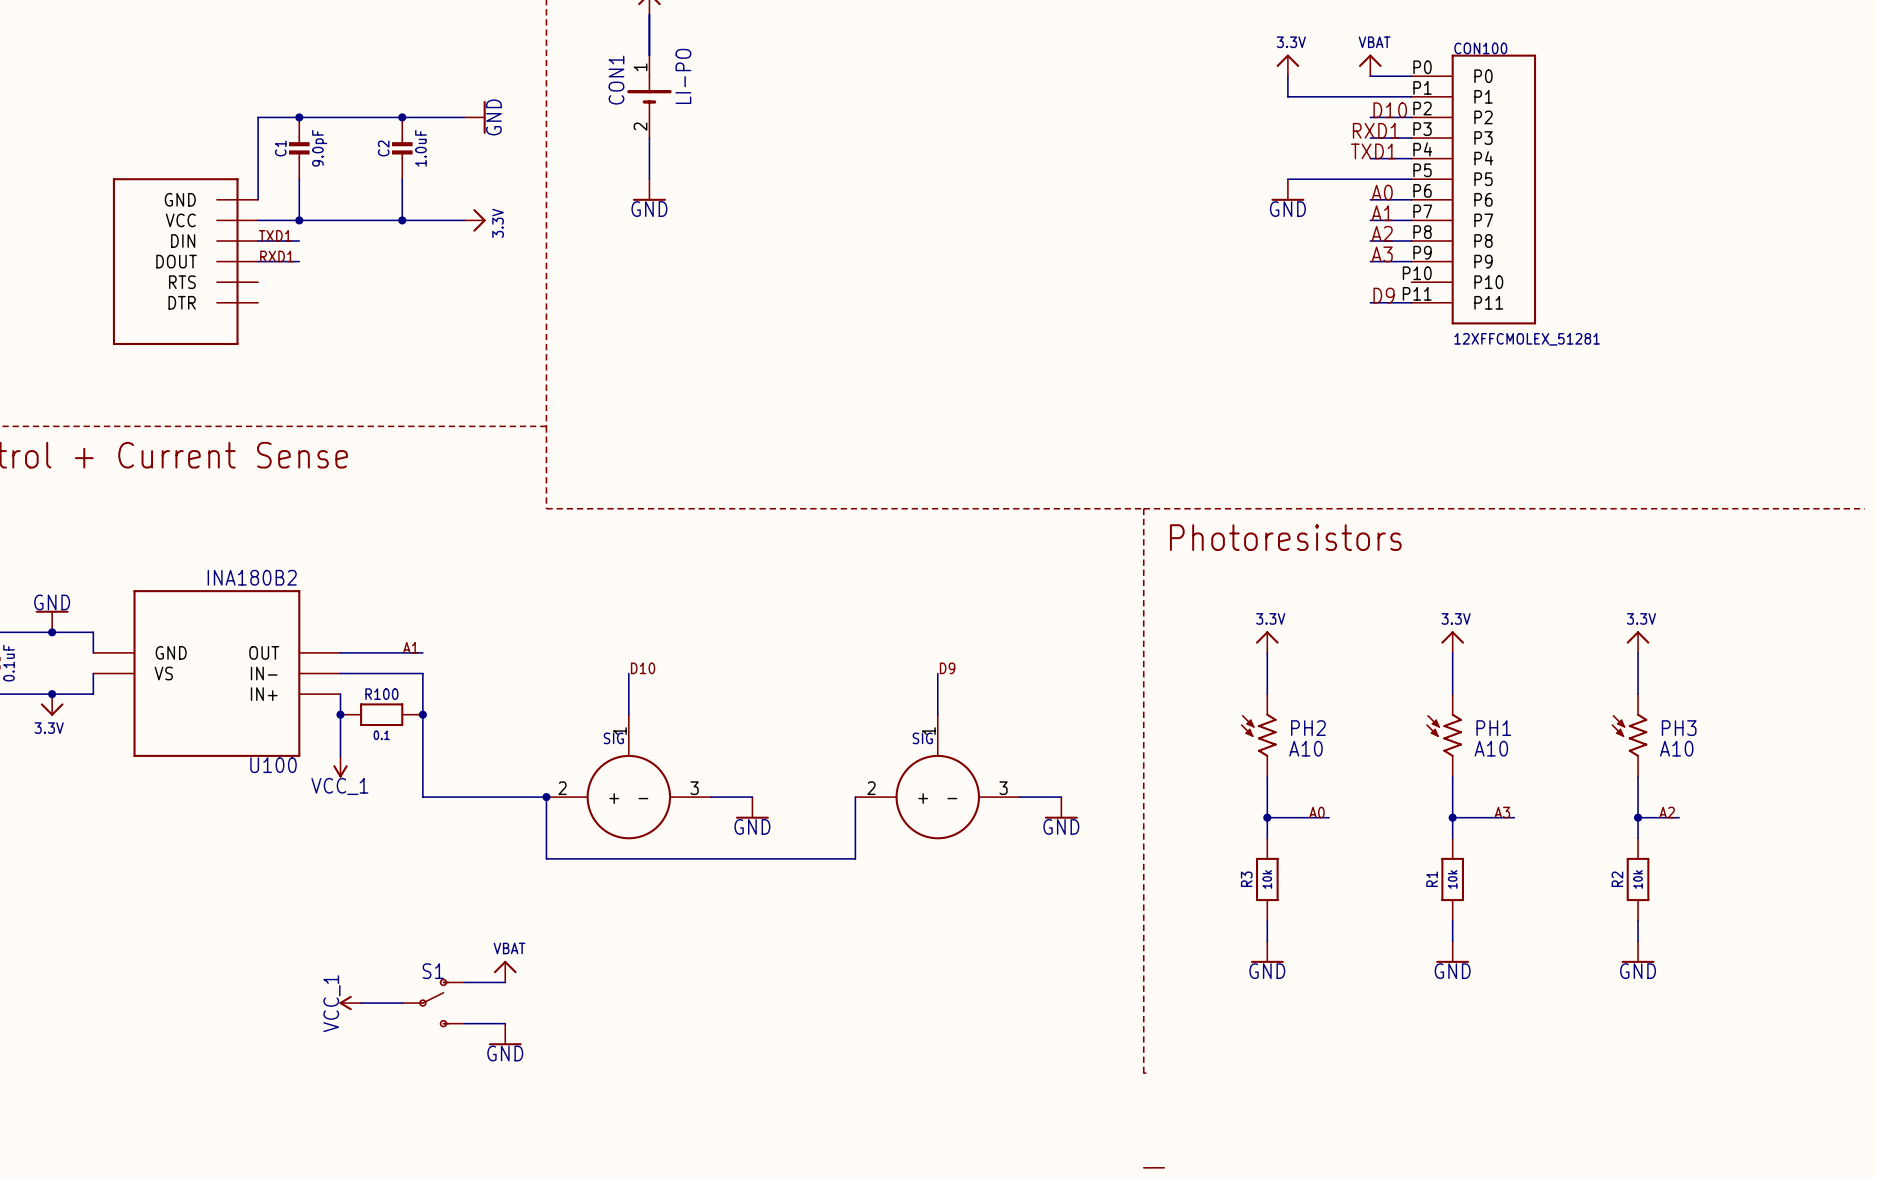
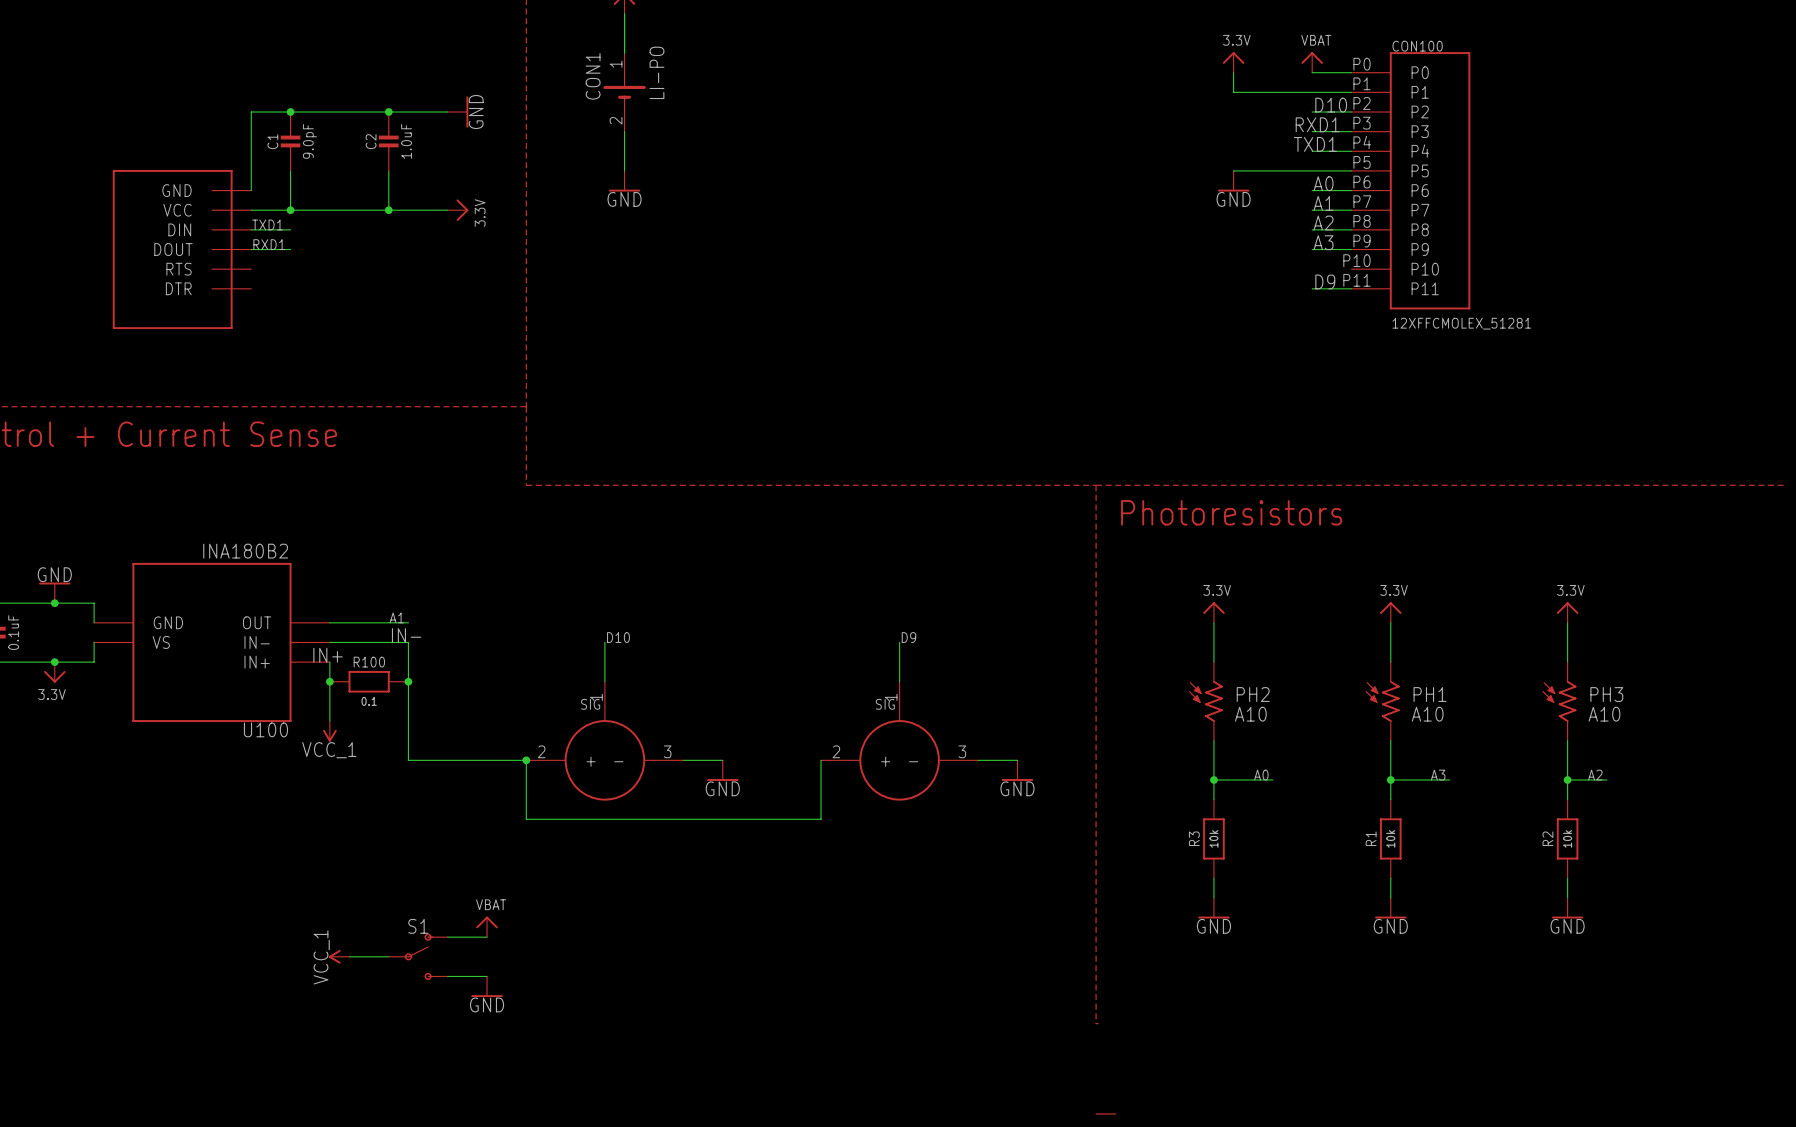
label: none -> IN- (406, 635)
label: none -> IN+ (328, 655)

